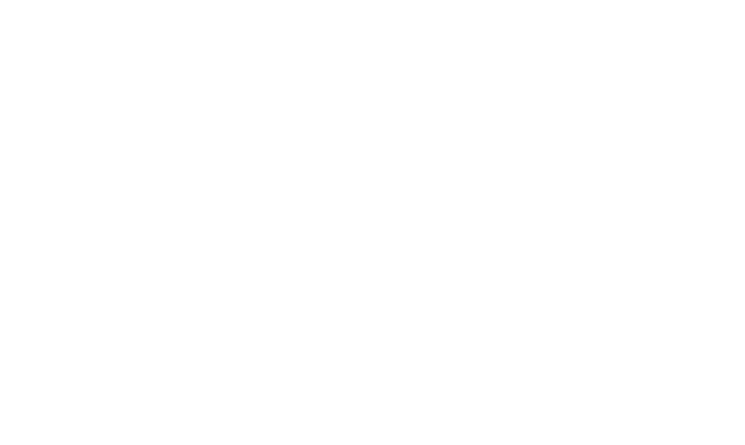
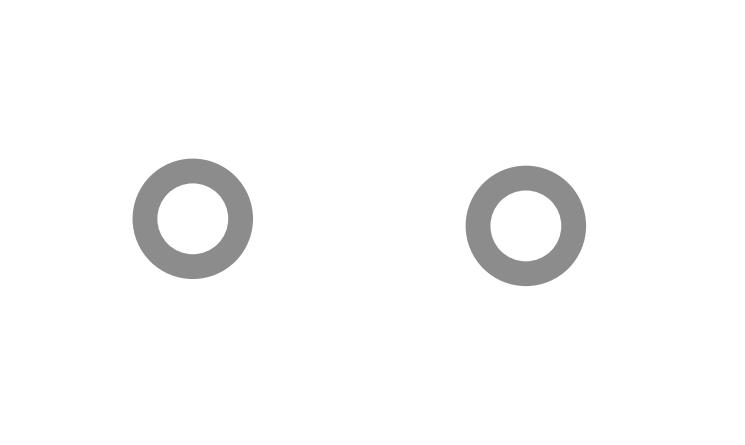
part: none -> (192, 218)
part: none -> (525, 225)

